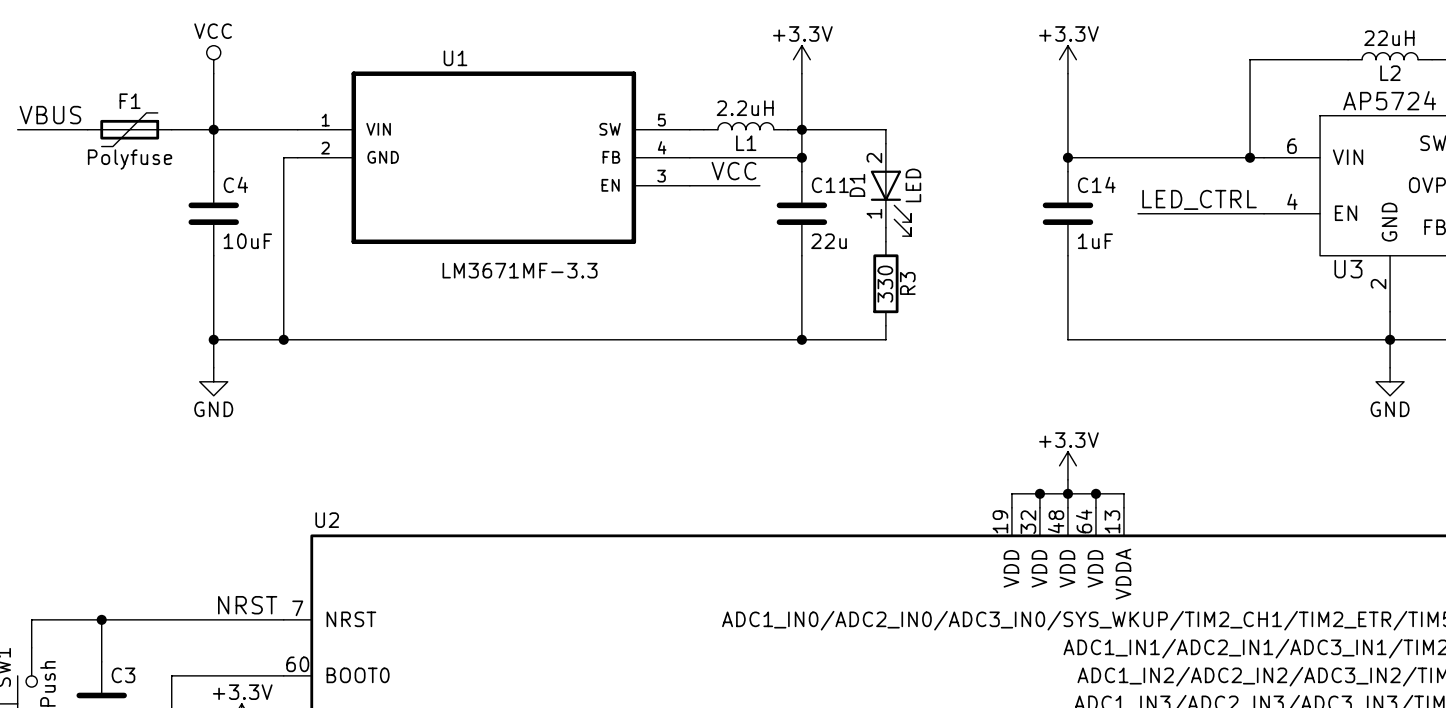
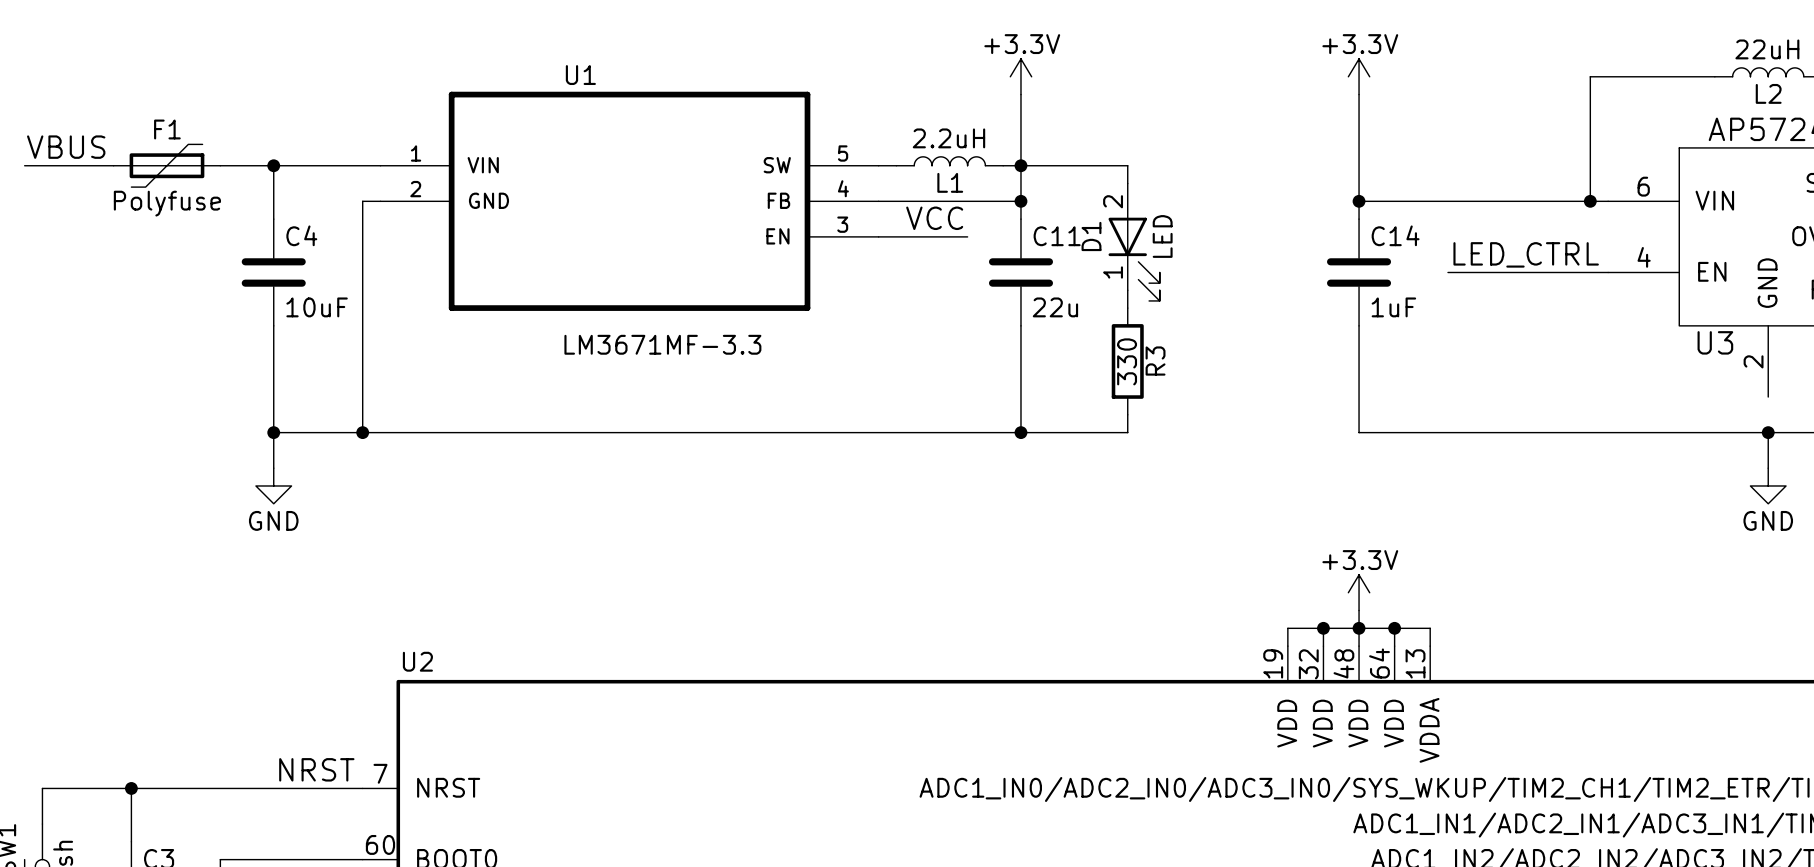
power symbol: VCC (213, 59) -> none
wire: (213, 73) (213, 129) -> none
wire: (1390, 311) (1390, 339) -> none

